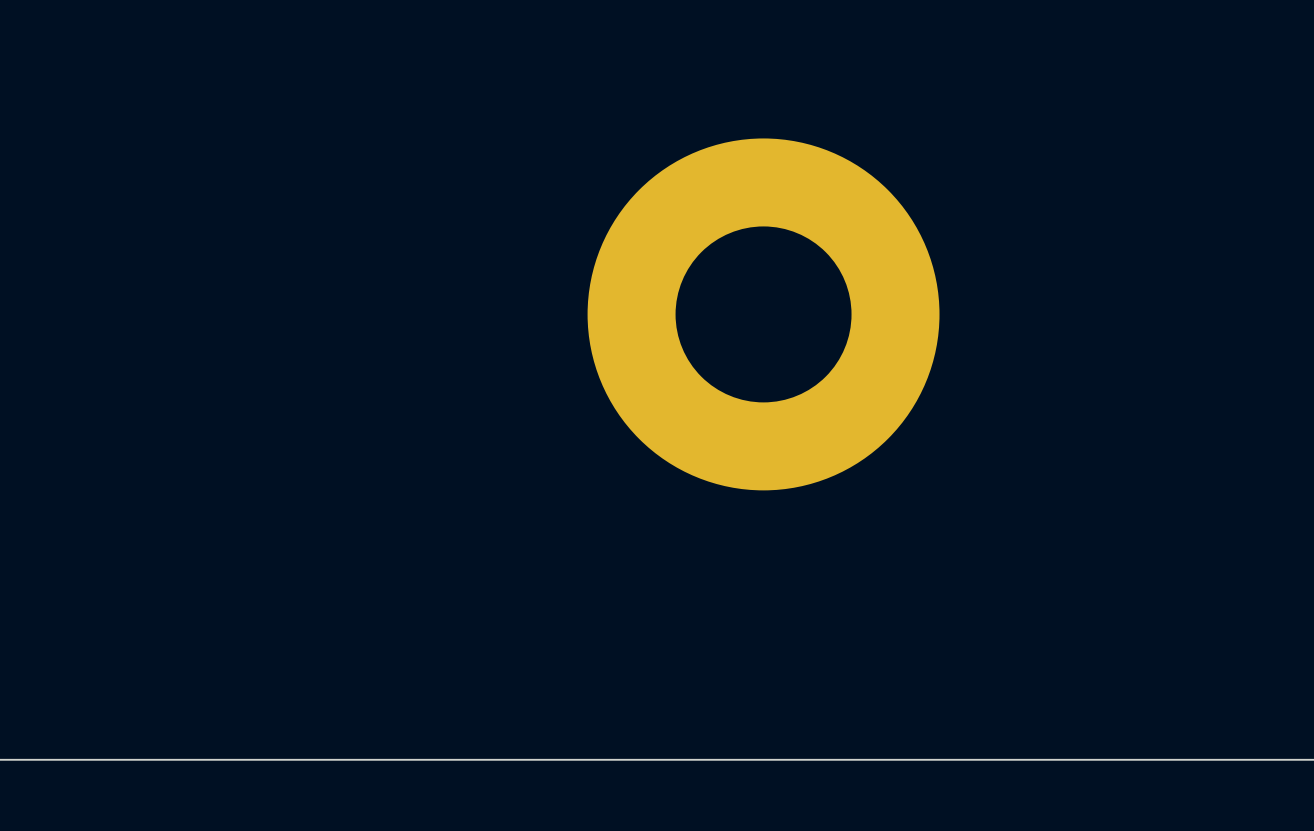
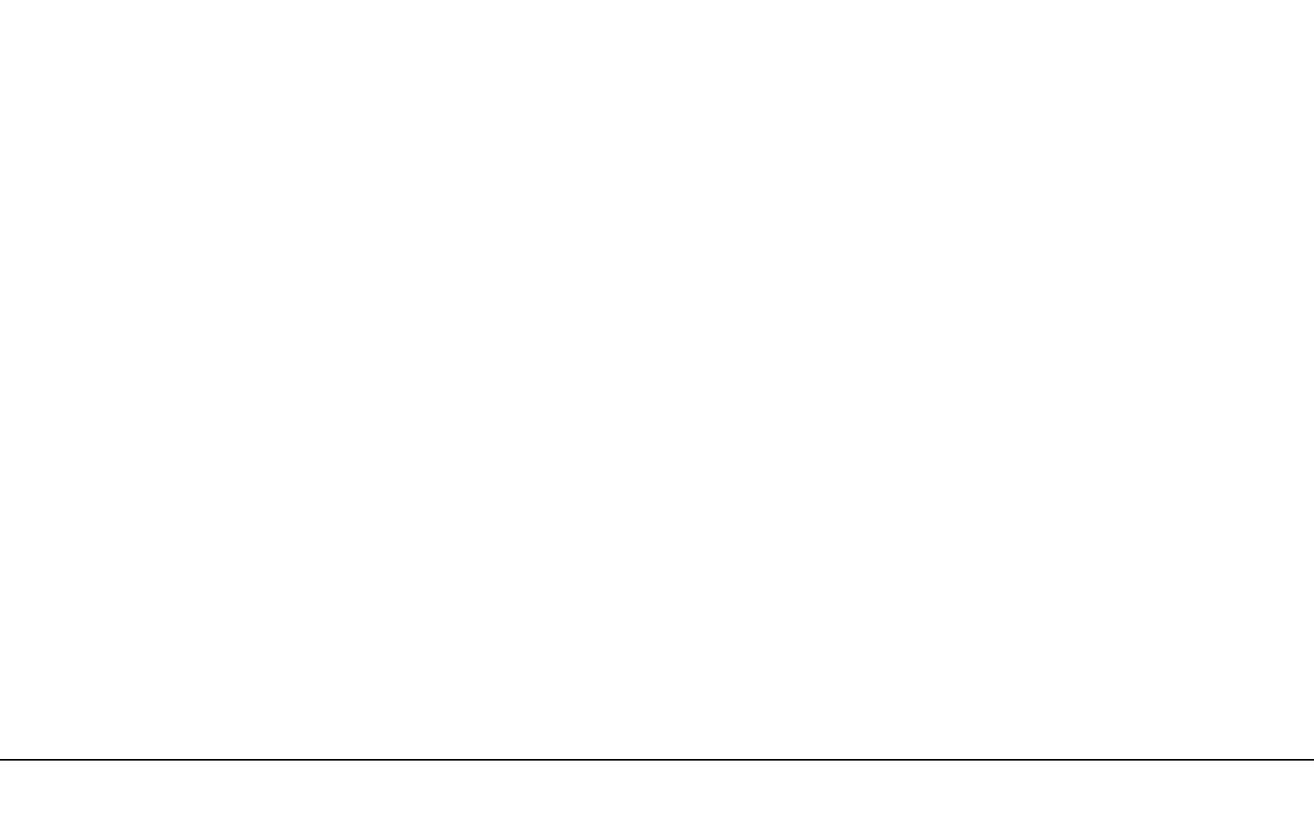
part: (763, 314) -> none

